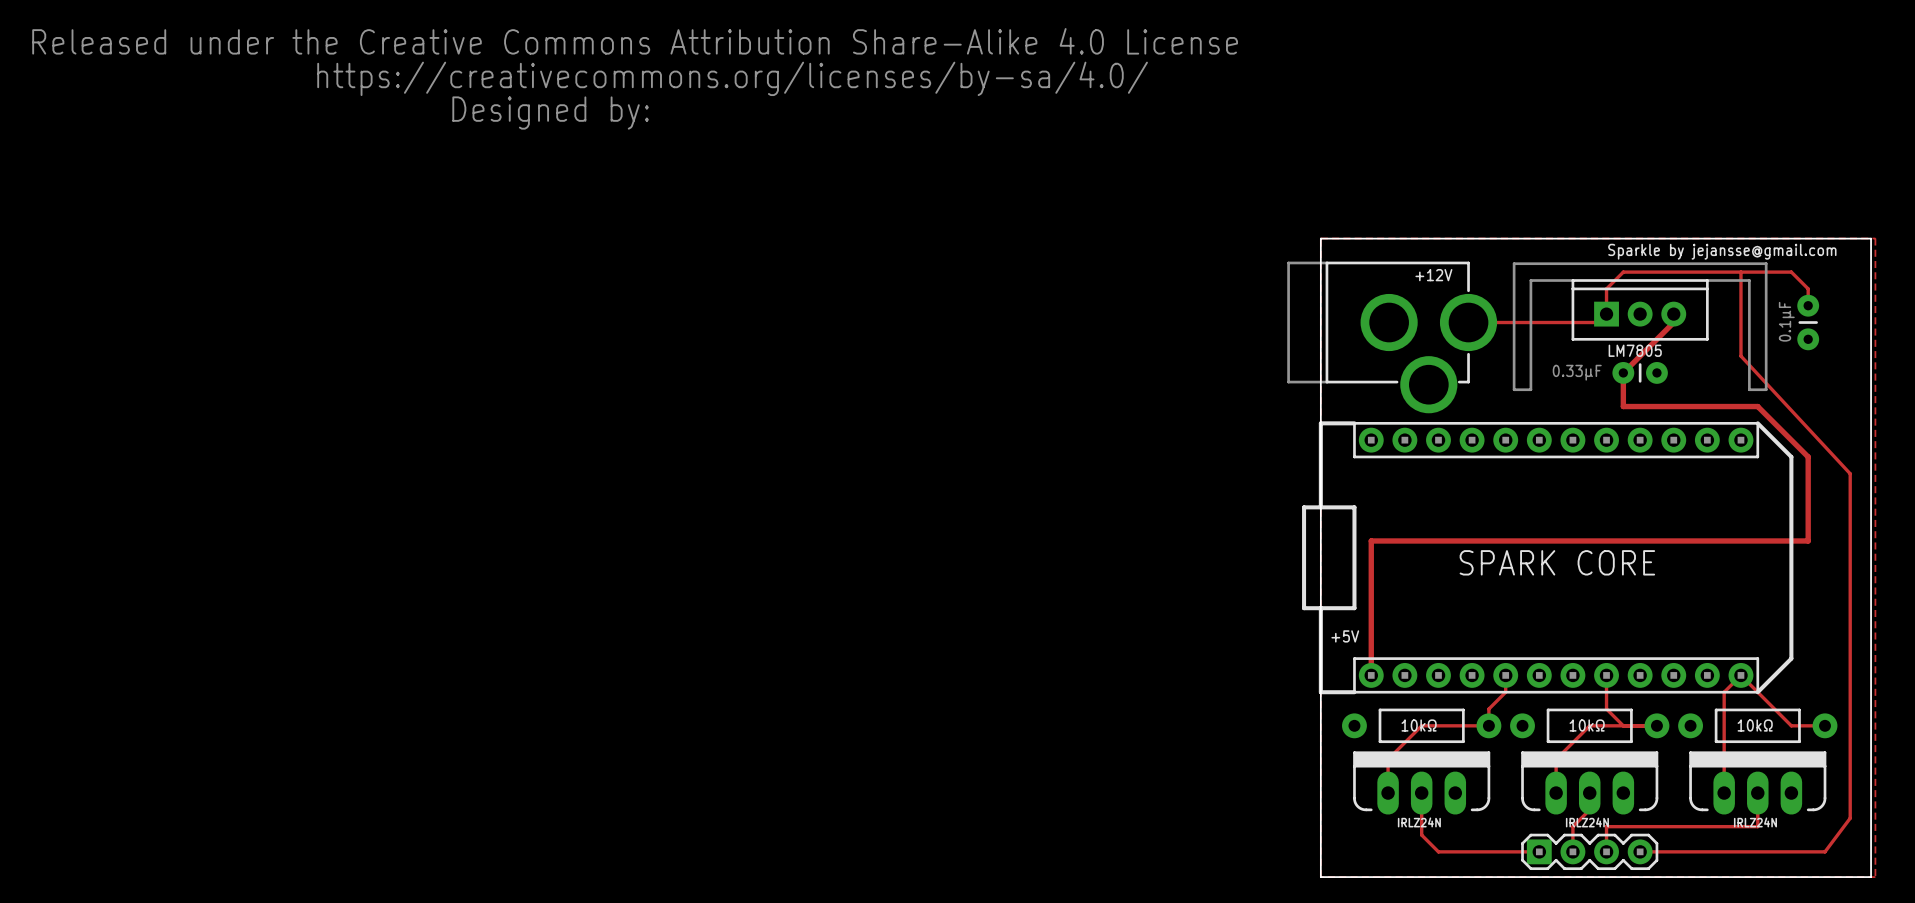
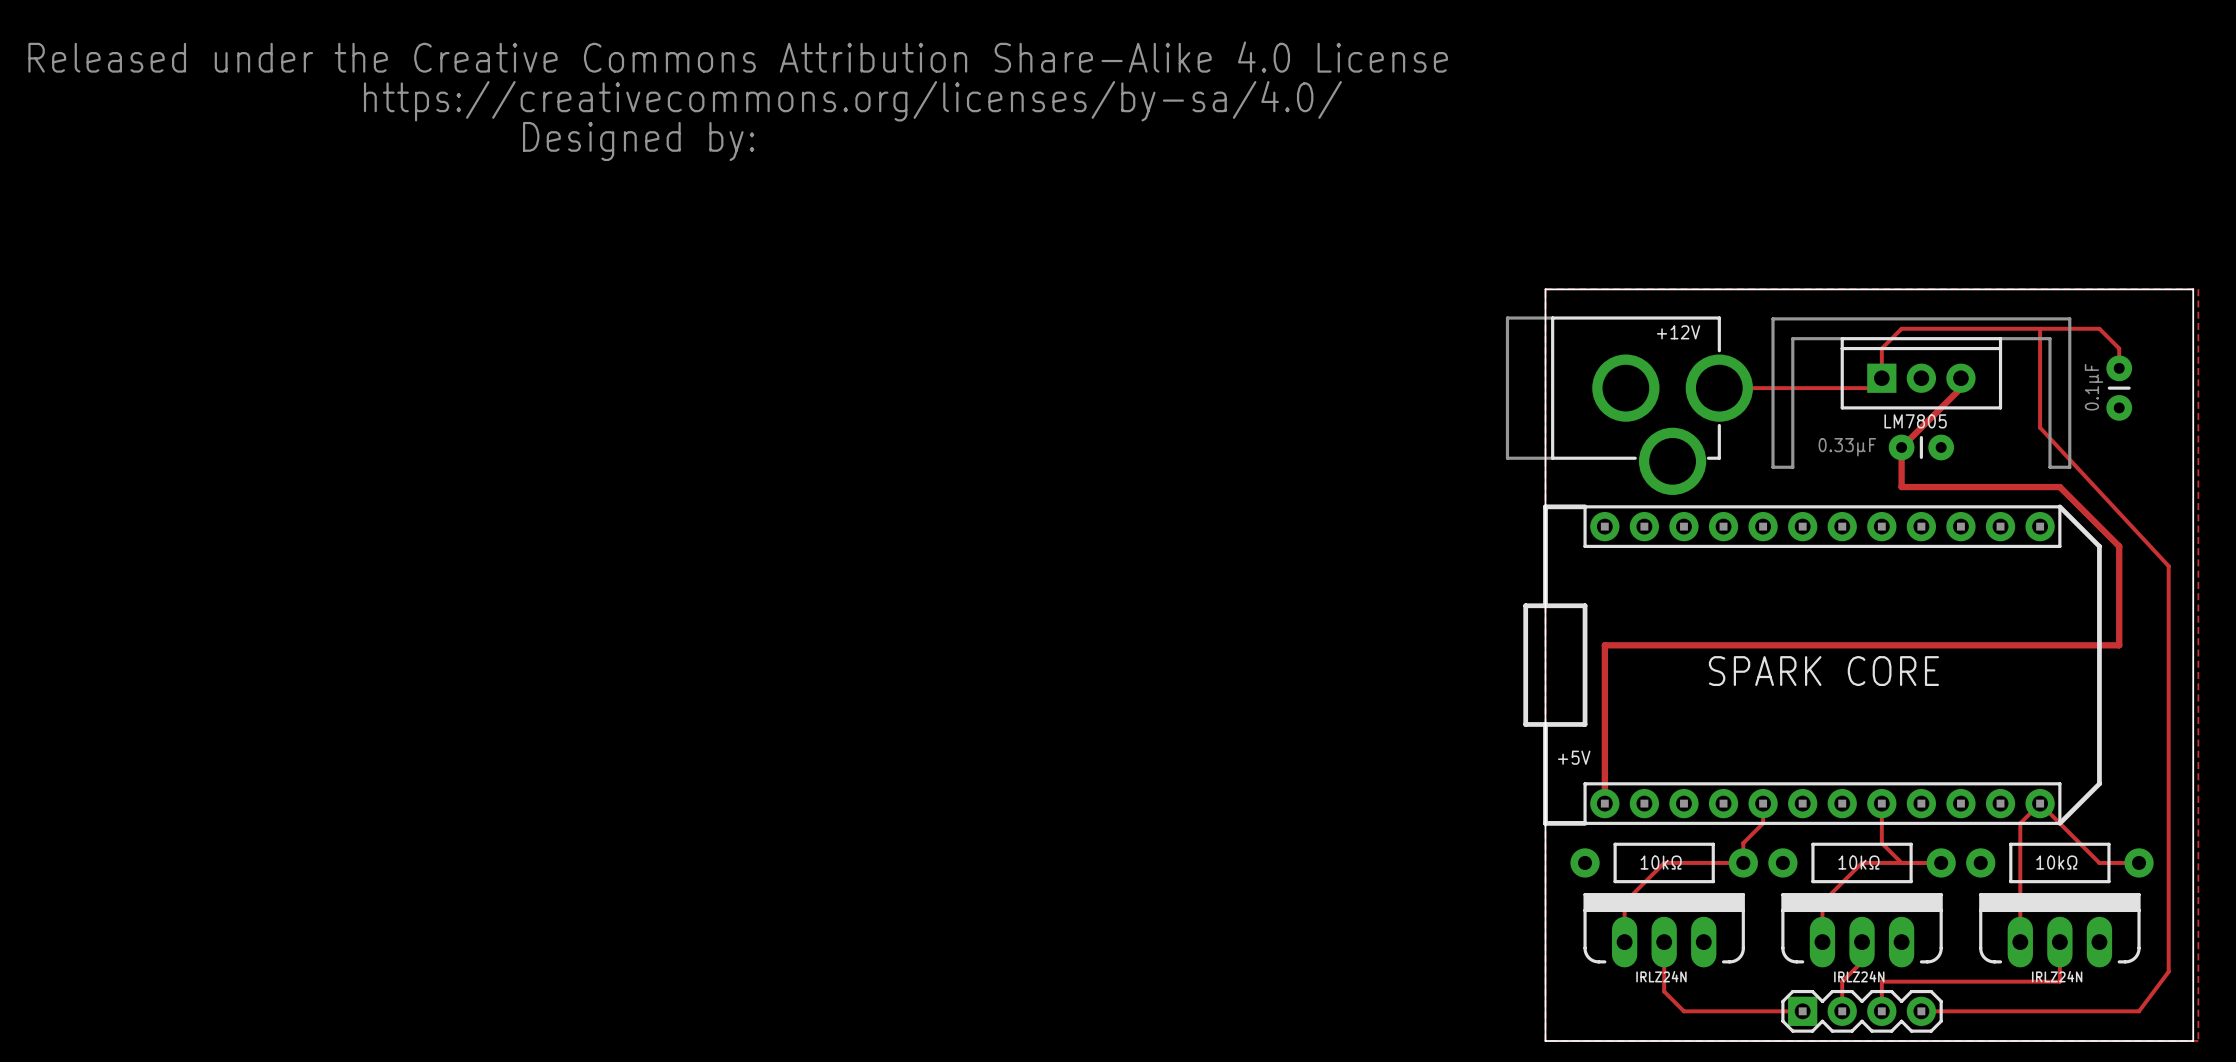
text: Sparkle by jejansse@gmail.com (1722, 251) -> none

